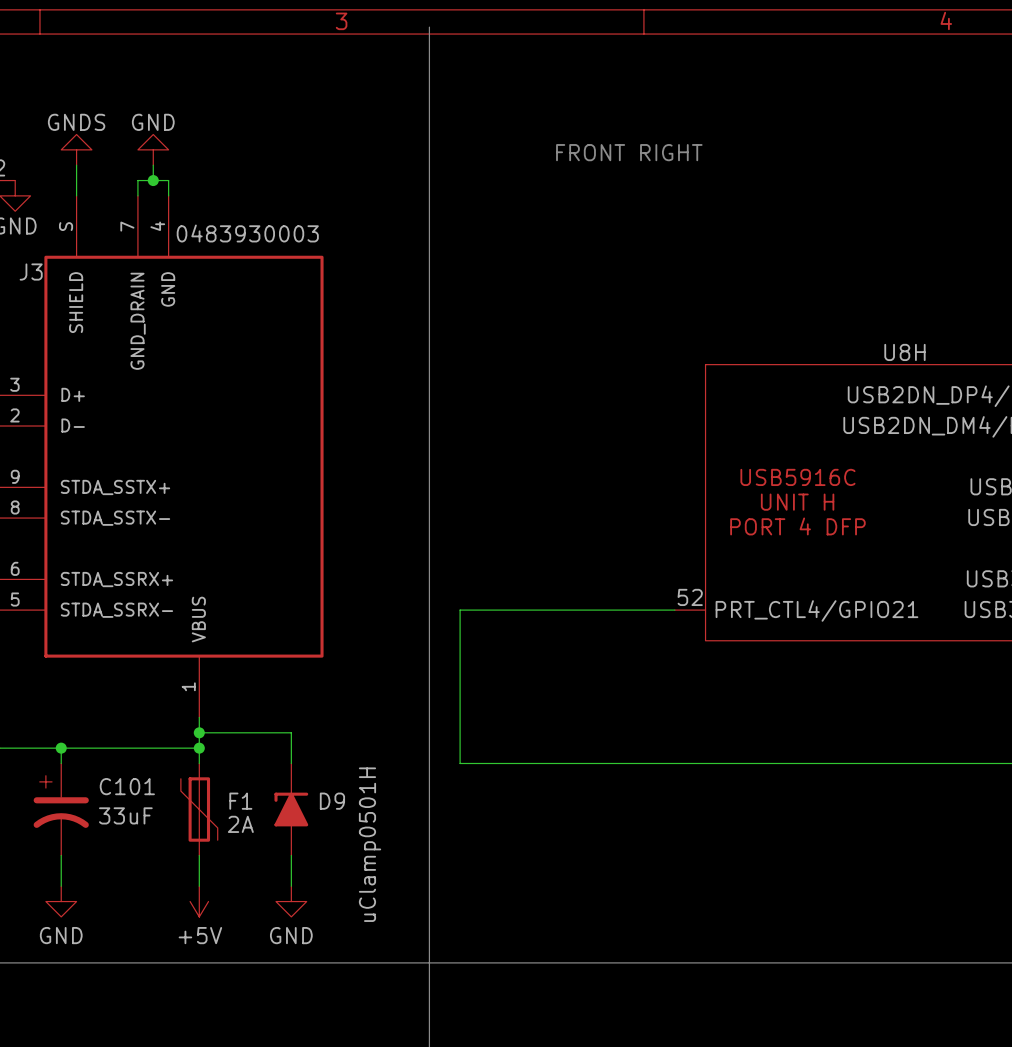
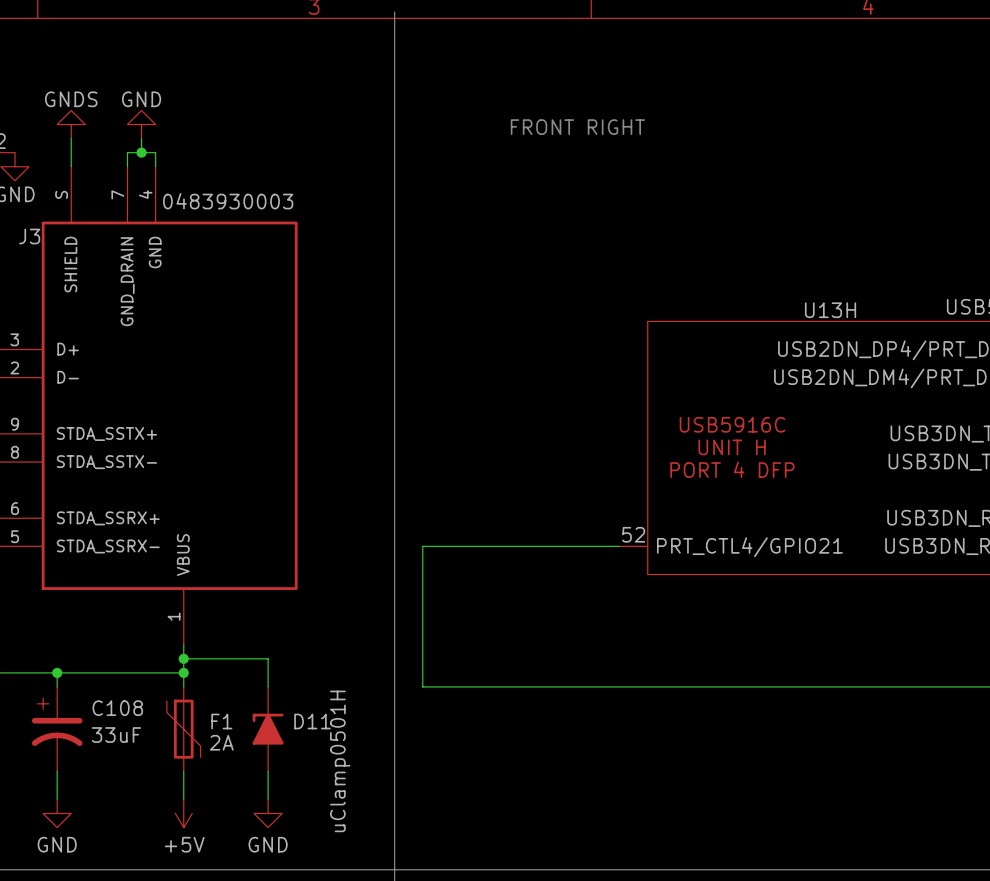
U8H name: U8H (904, 352) -> U13H (830, 310)
C101 name: C101 (127, 786) -> C108 (117, 708)
D9 name: D9 (332, 801) -> D11 (312, 721)

